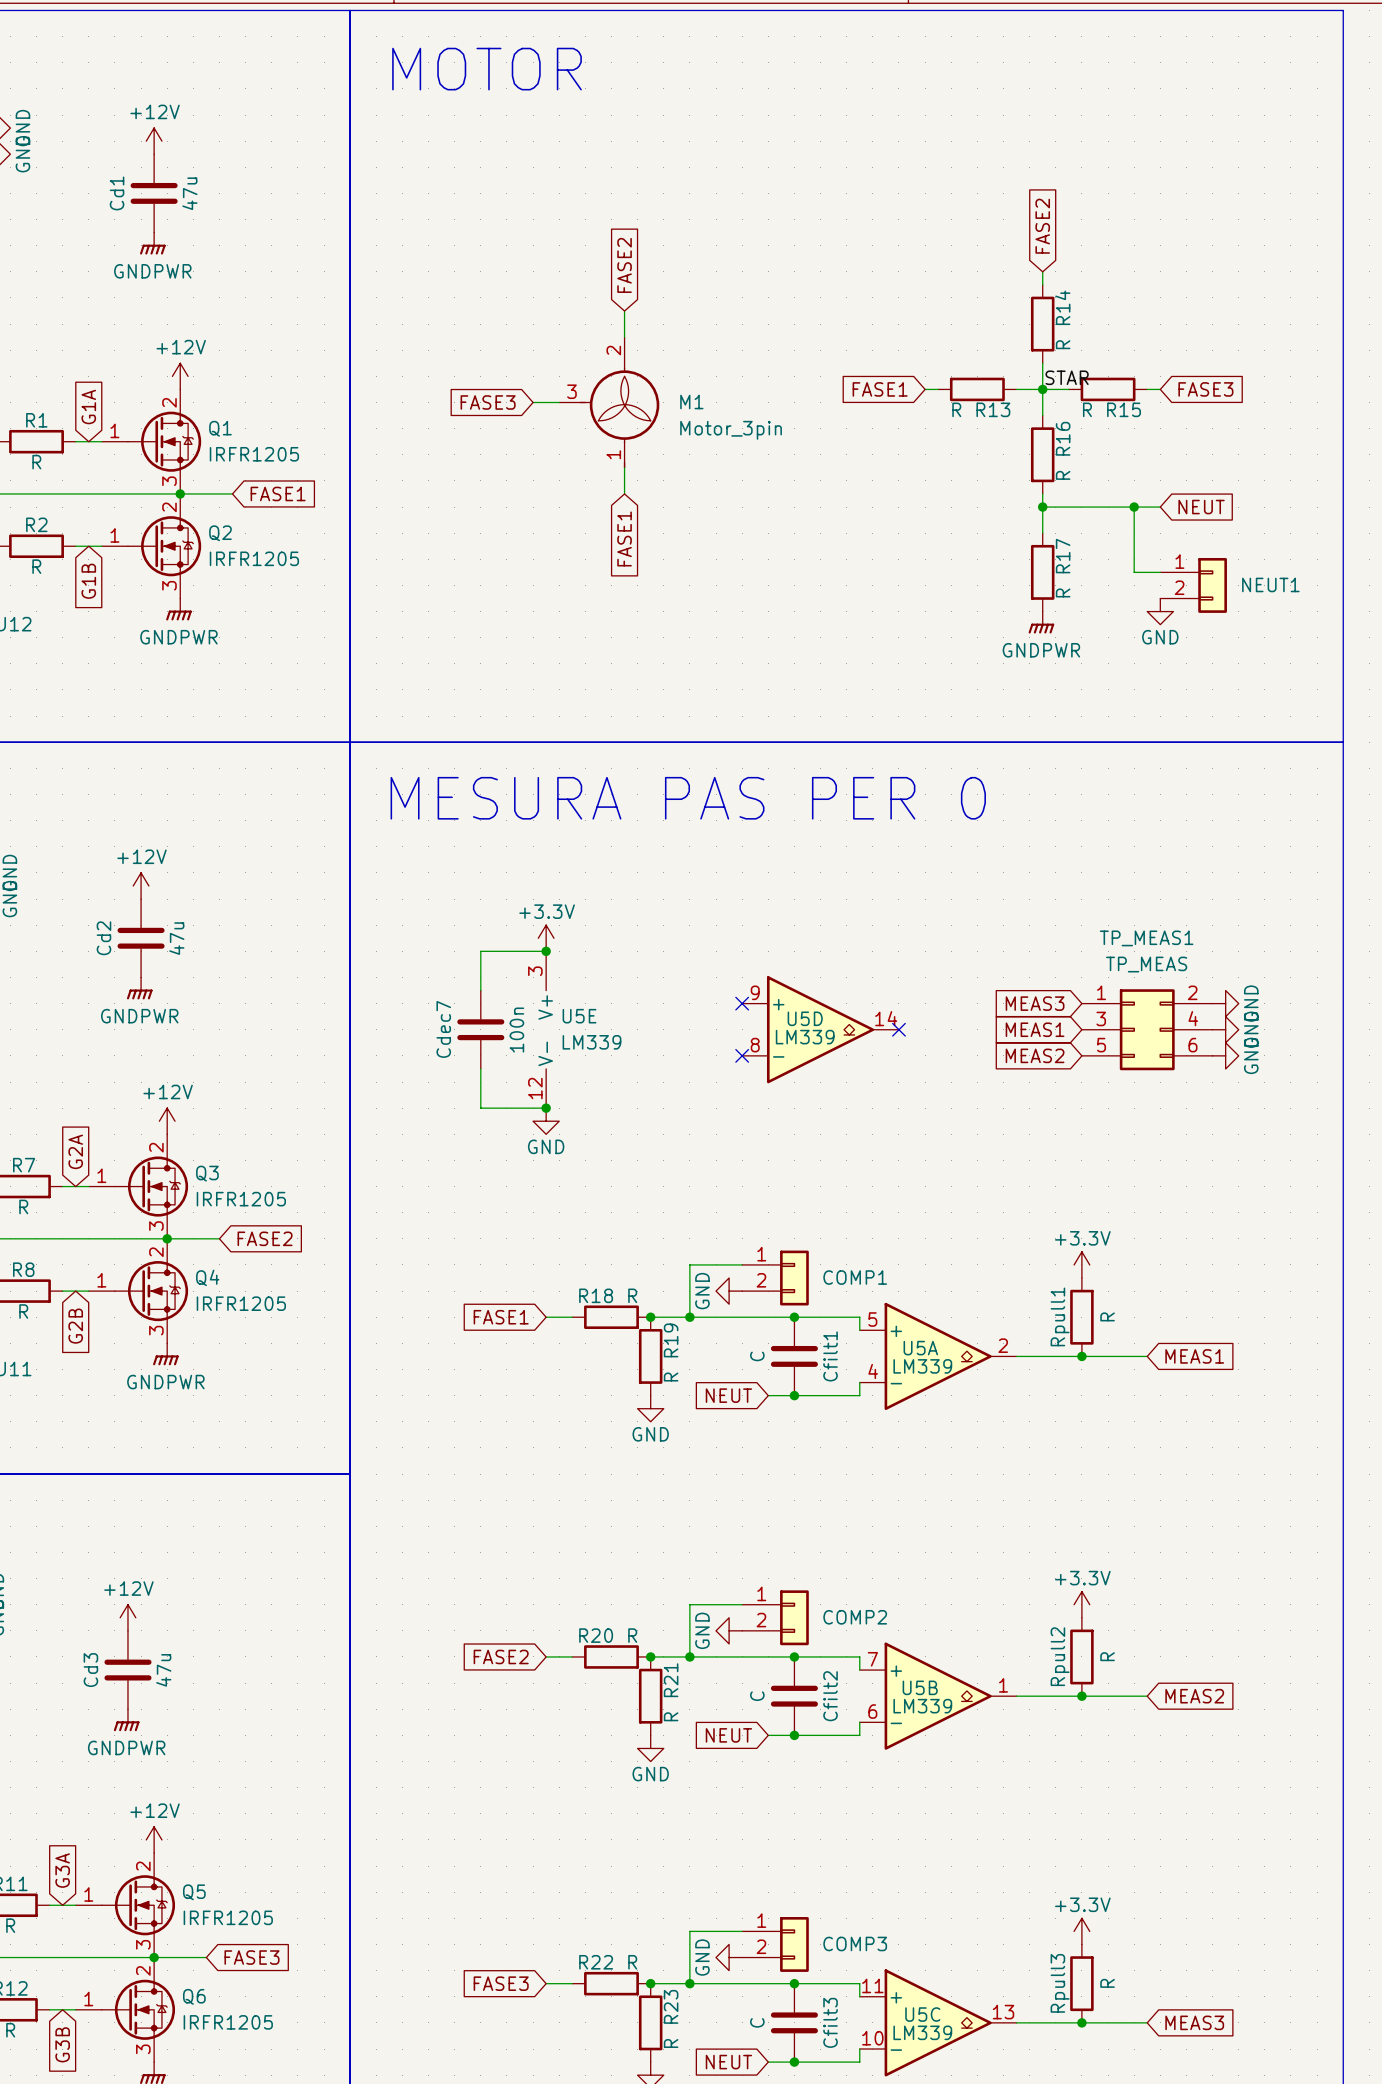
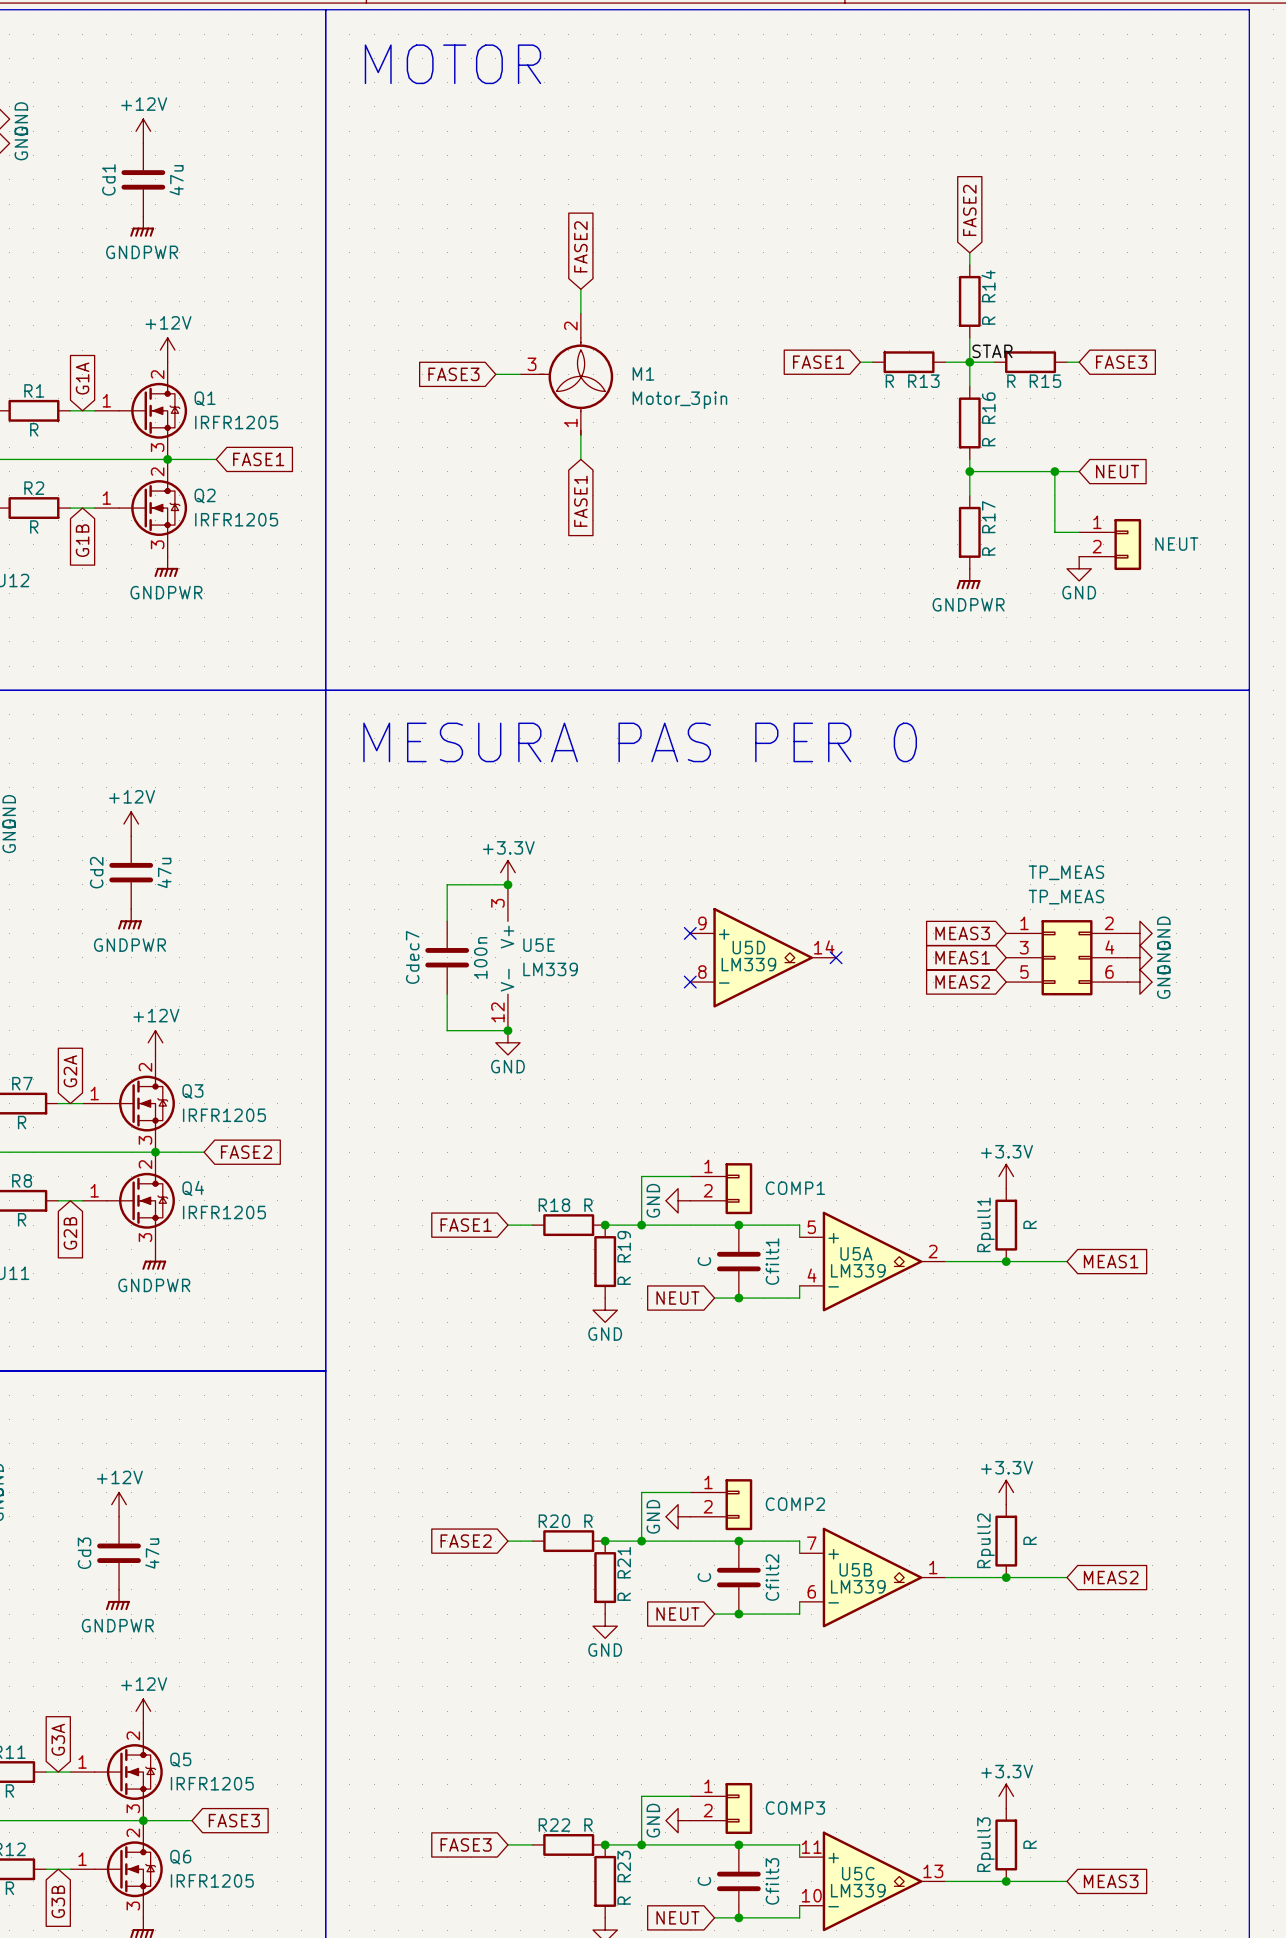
NEUT1 name: NEUT1 (1270, 584) -> NEUT (1176, 544)
TP_MEAS1 name: TP_MEAS1 (1146, 938) -> TP_MEAS (1066, 872)

